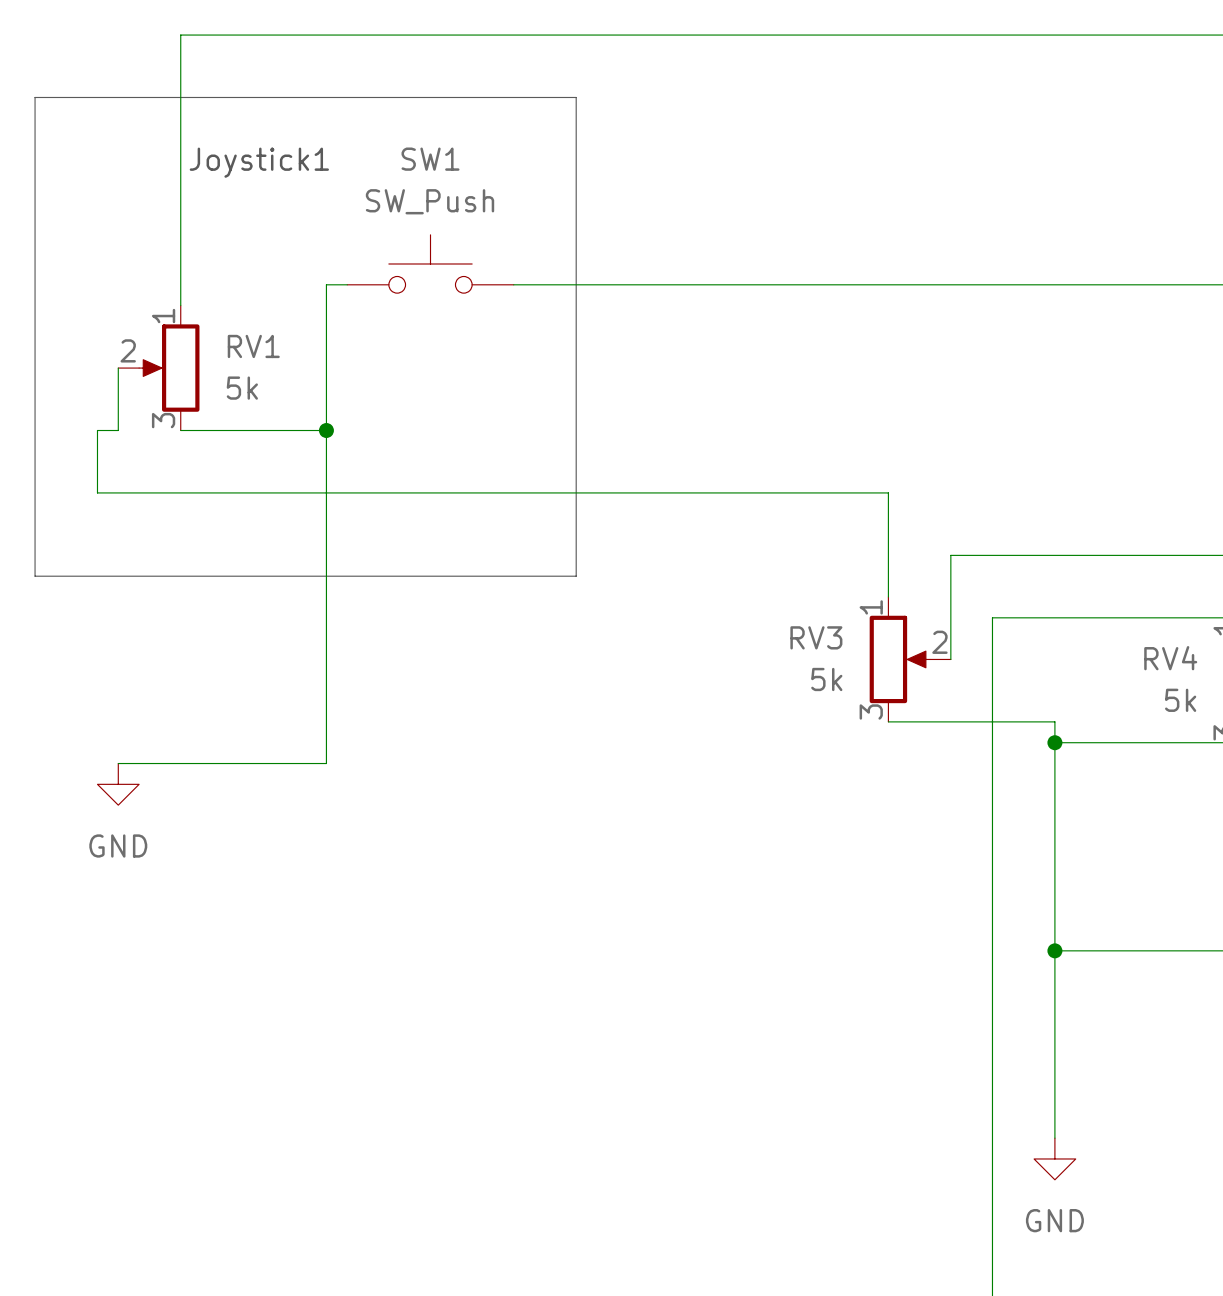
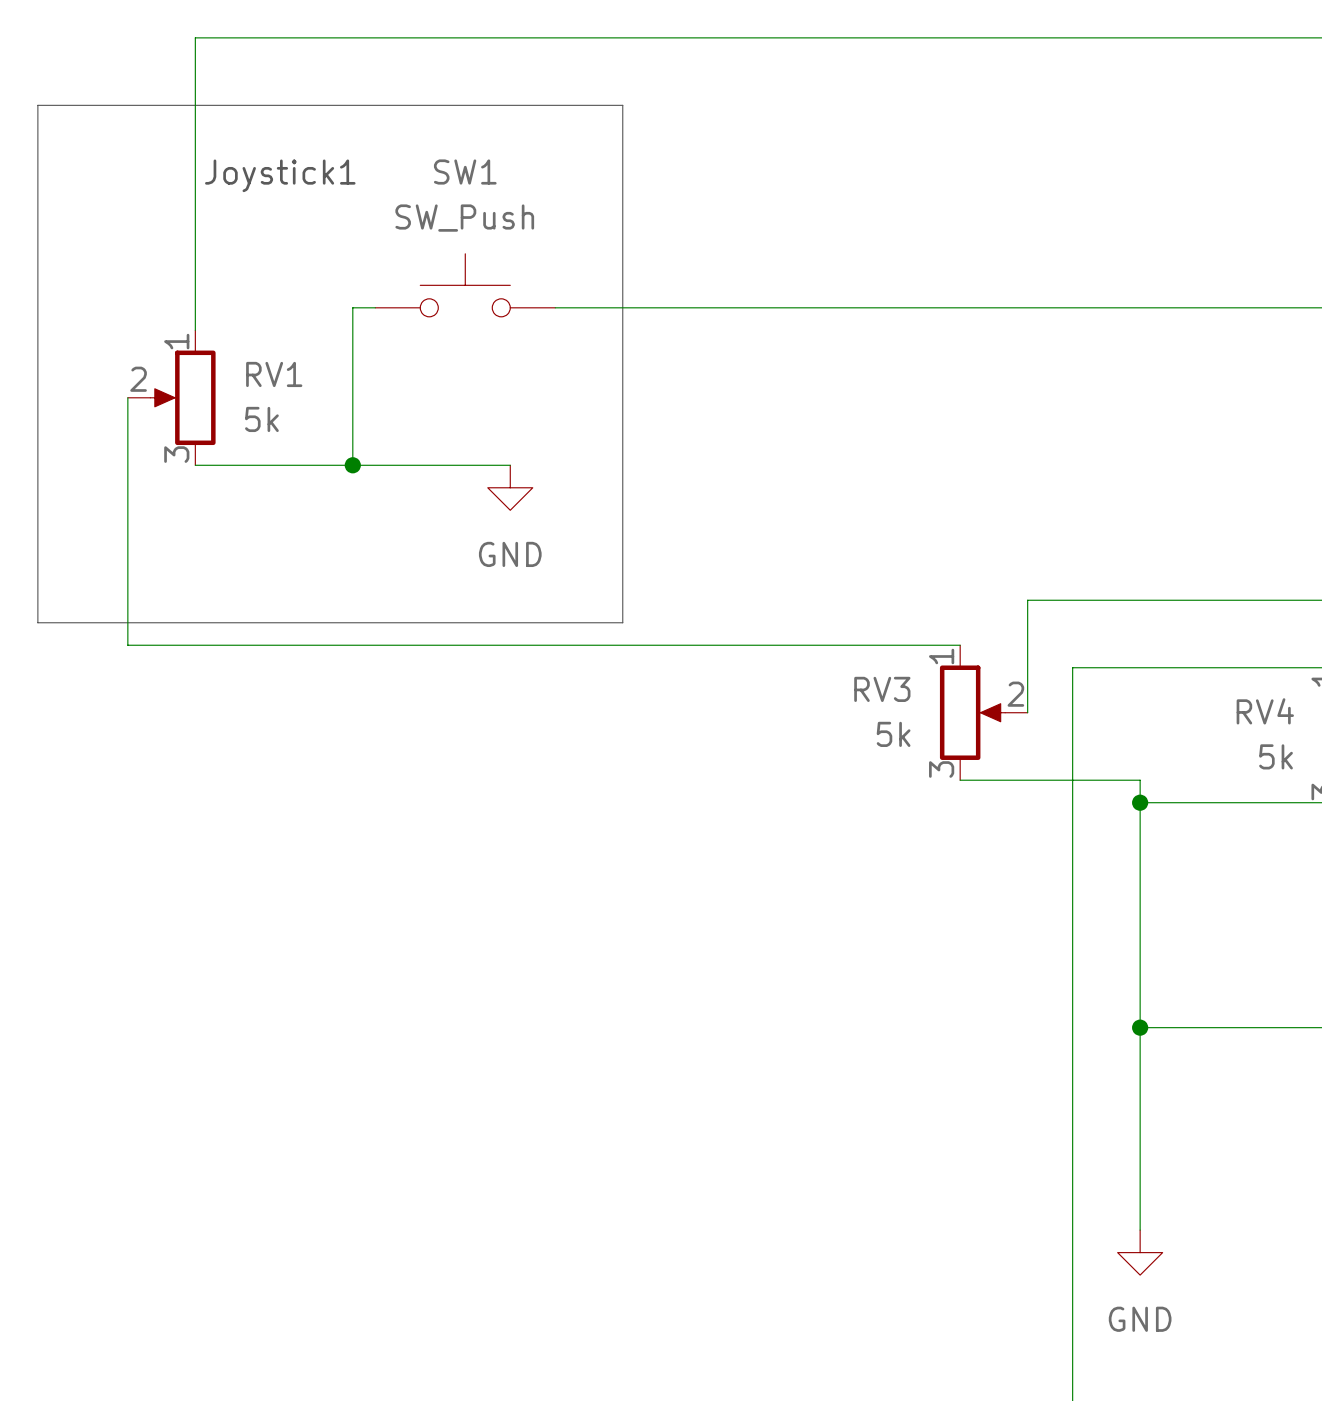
wire: (118, 430) (97, 430) (97, 492) (888, 492) (888, 597) -> (127, 465) (127, 645) (960, 645)
wire: (326, 430) (326, 763) (118, 763) -> (352, 465) (510, 465)
power symbol: none -> GND (510, 487)
power symbol: GND (118, 784) -> none

